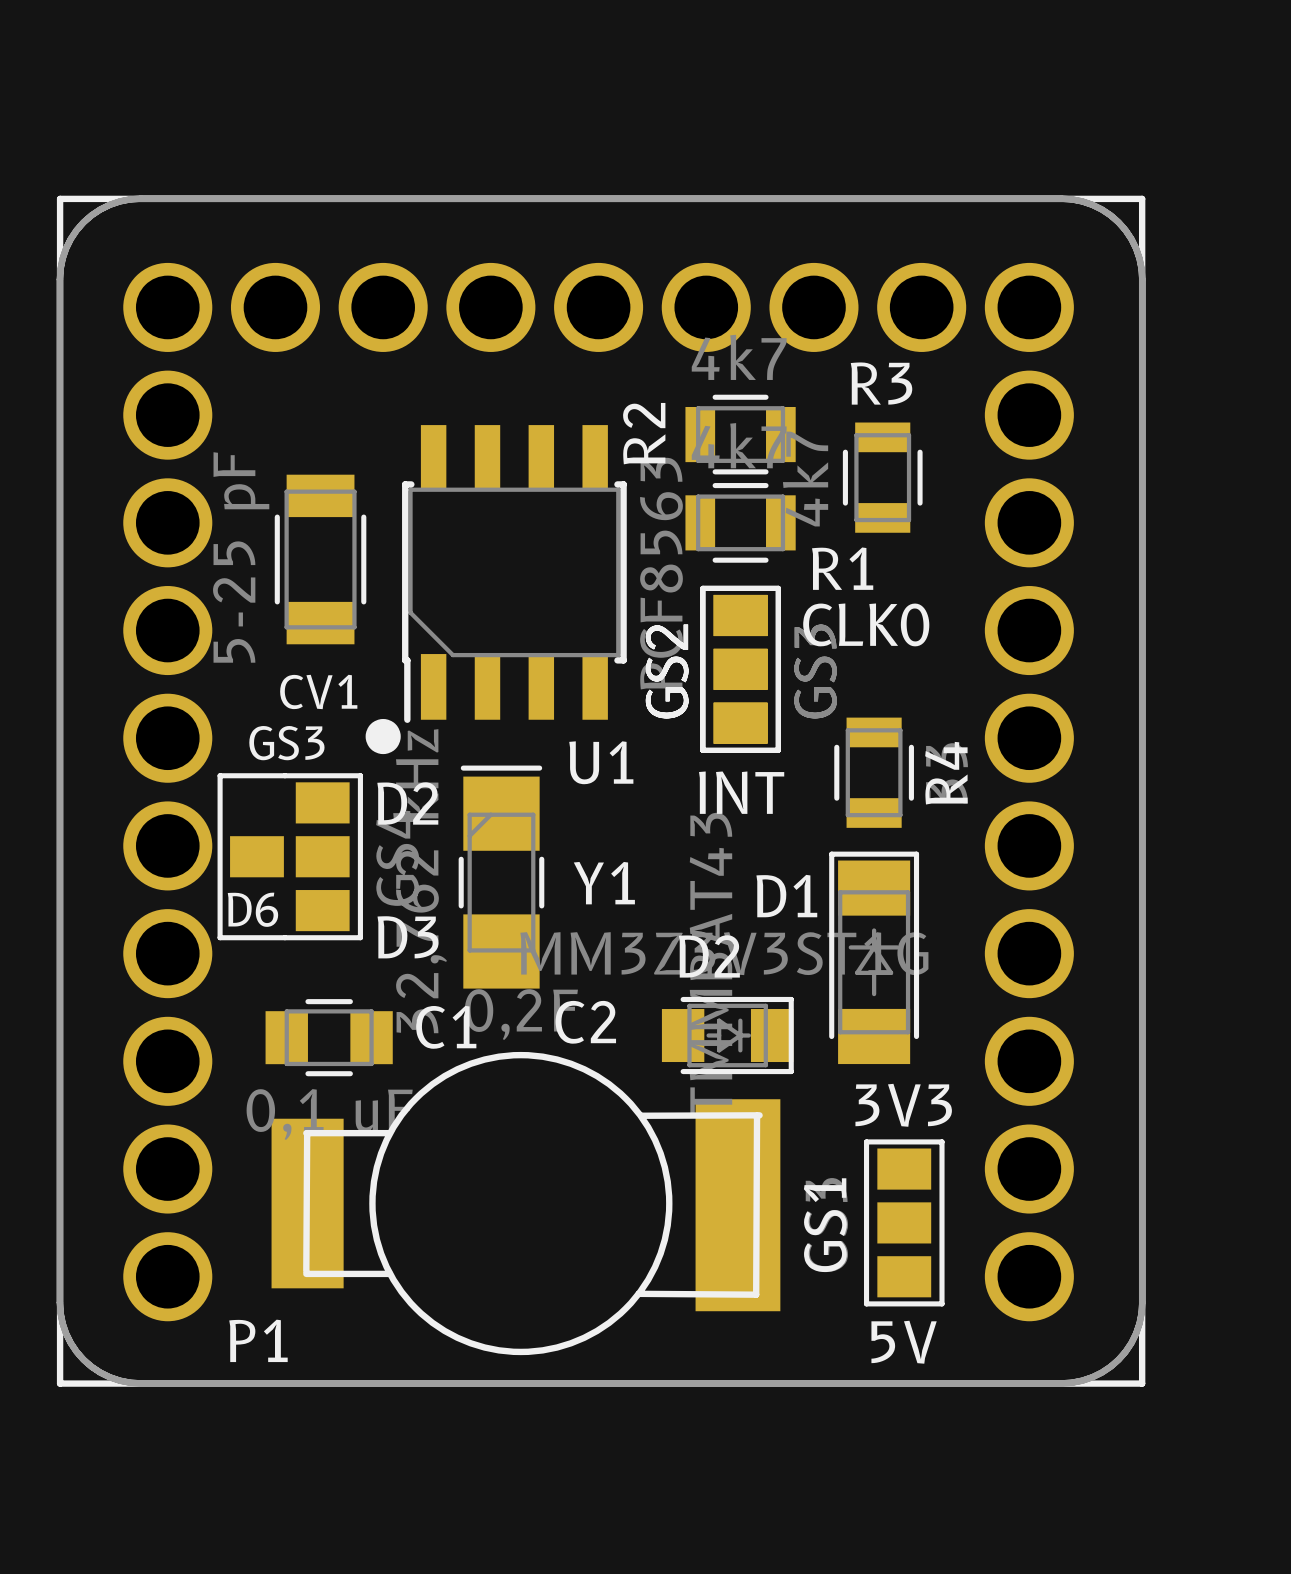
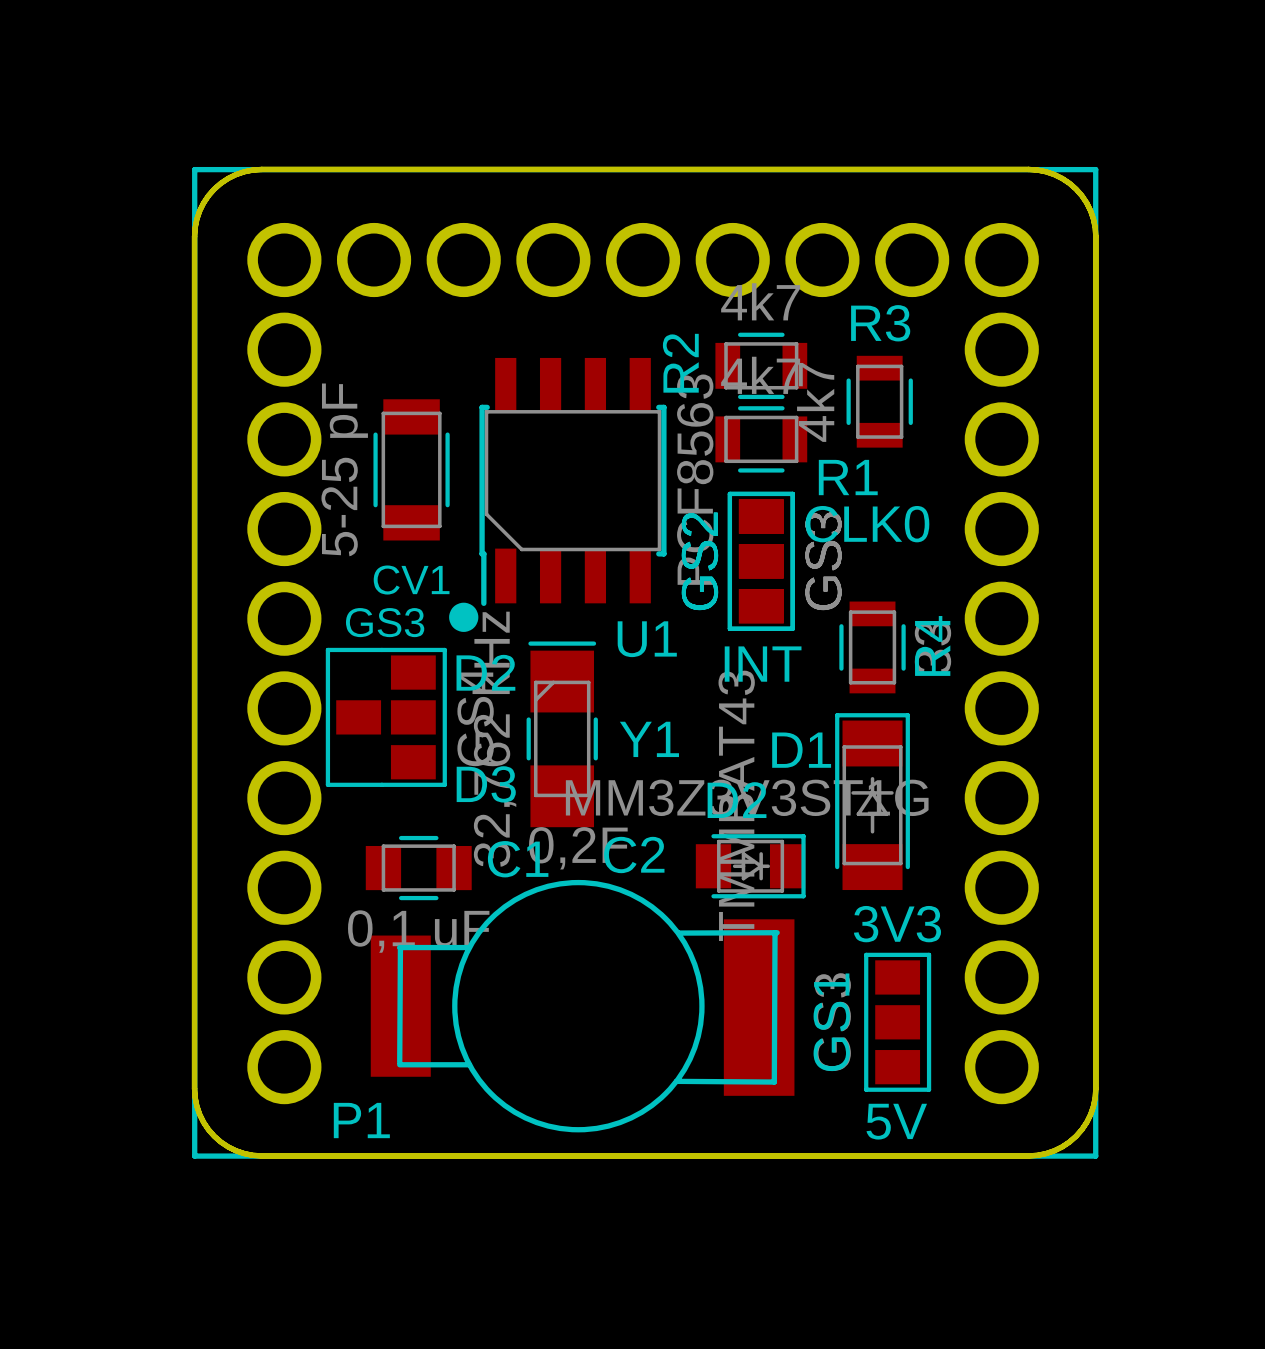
text: D6 (252, 909) -> none

